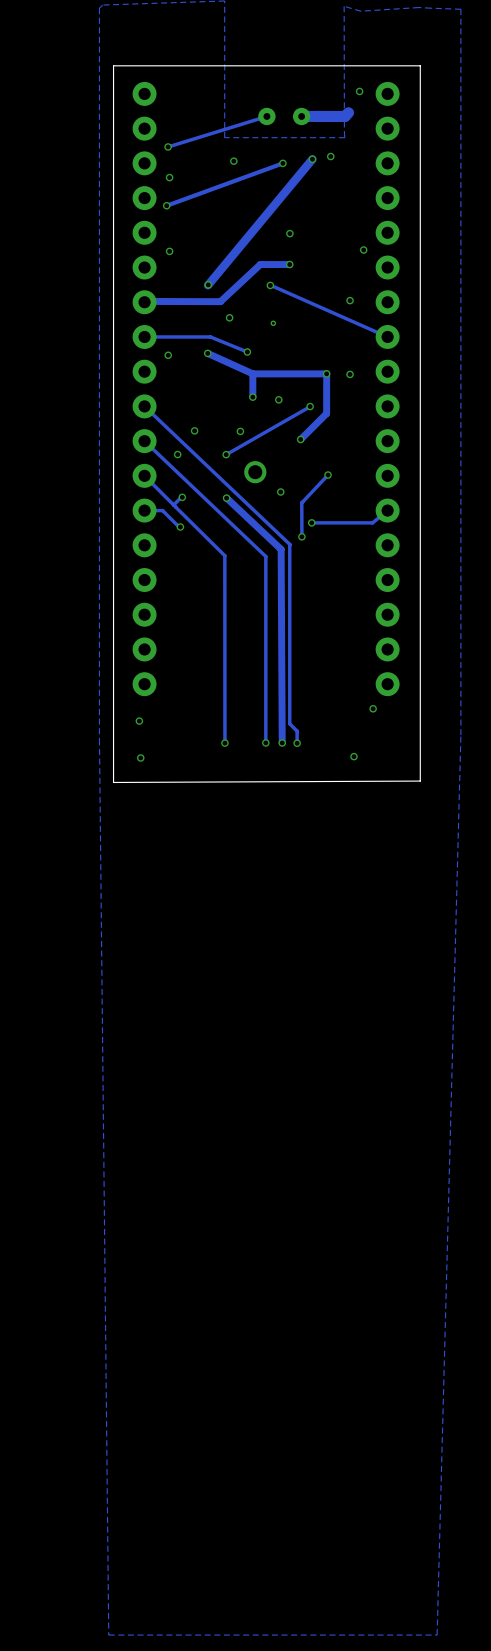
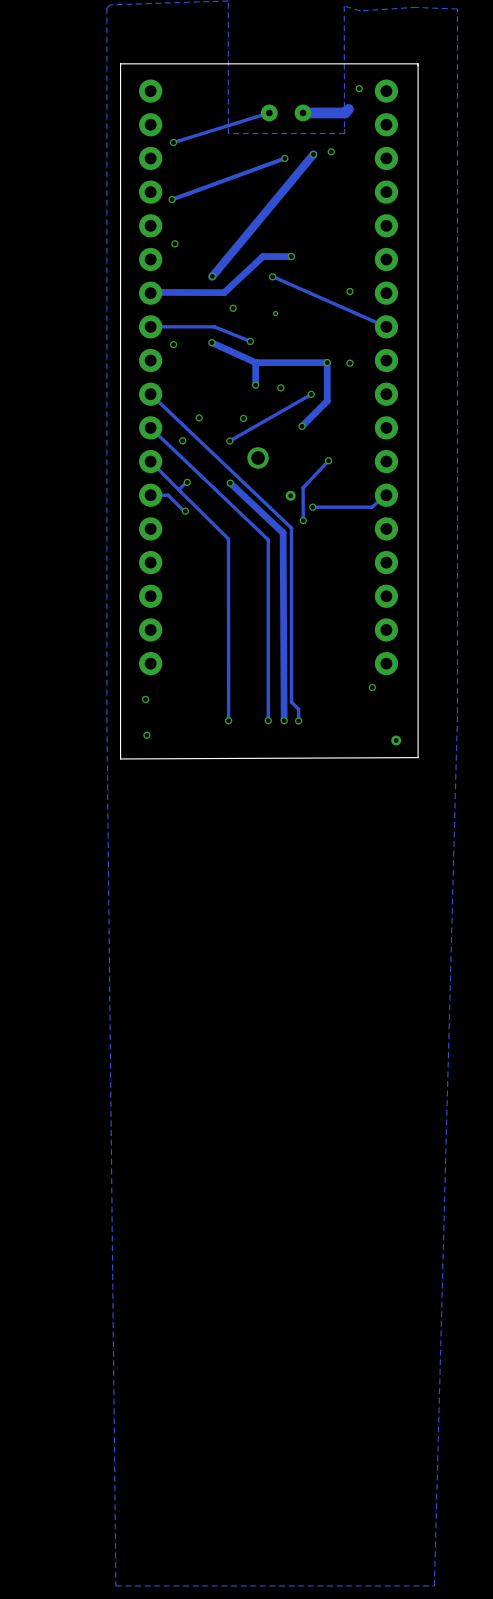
via: (233, 161) -> none
via: (169, 177) -> none
via: (289, 233) -> none
via: (363, 250) -> none
via: (280, 491) -> none
via: none -> (290, 495)
via: (354, 756) -> none
via: none -> (396, 740)

